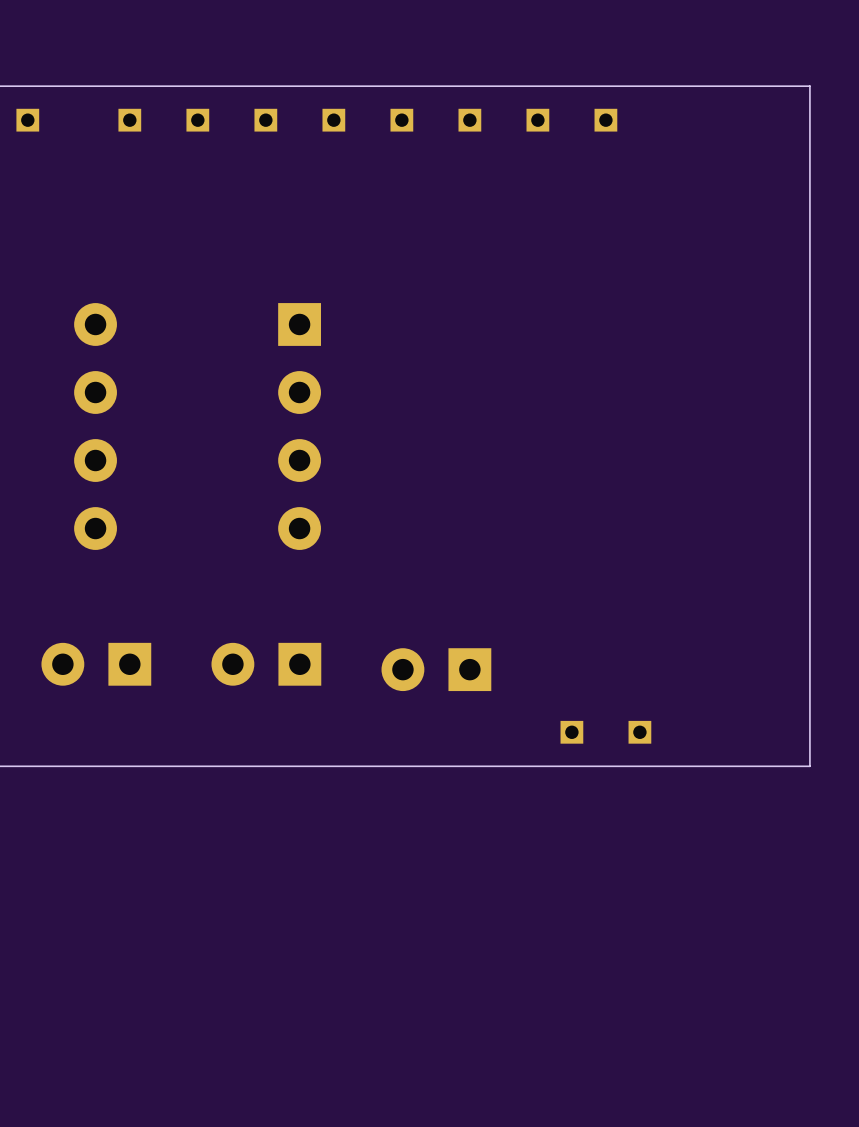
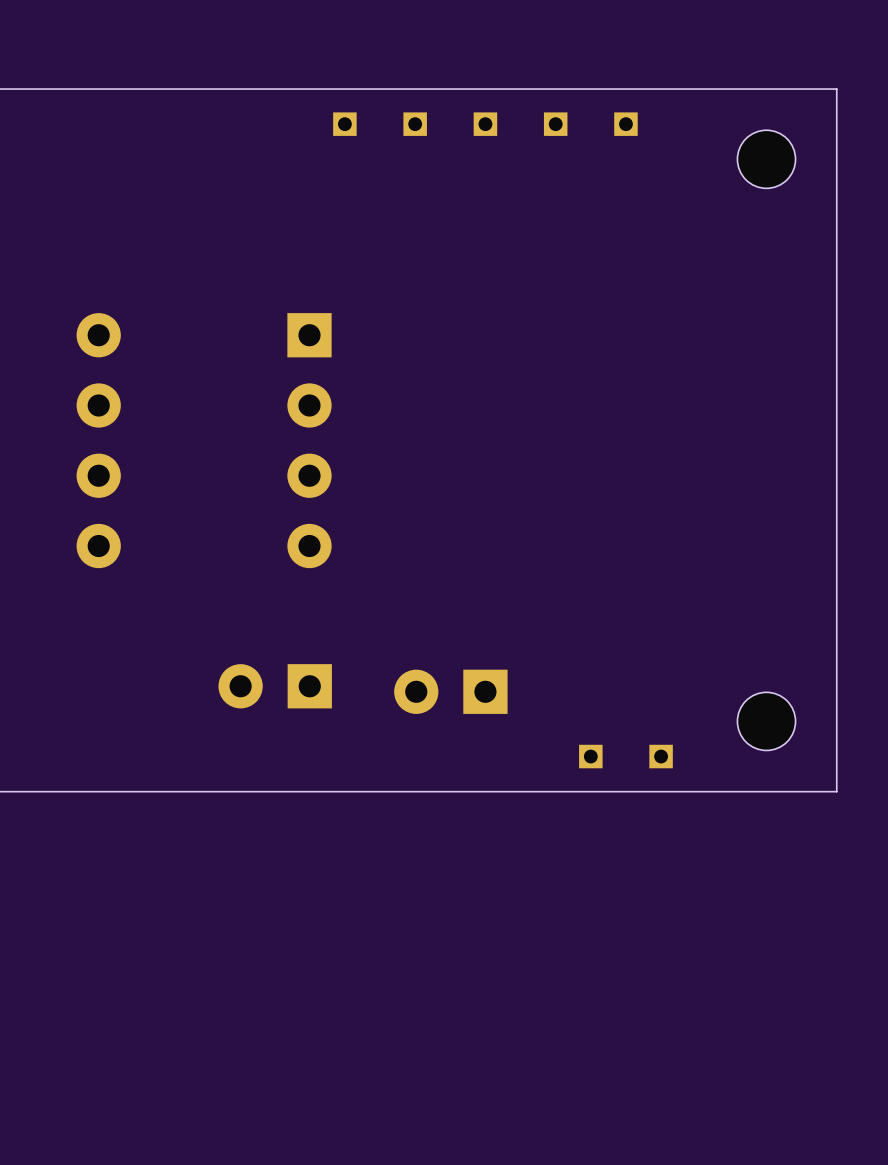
part: (27, 120) -> none
part: (129, 120) -> none
part: (197, 120) -> none
part: (265, 120) -> none
part: none -> (766, 159)
part: (96, 664) -> none
part: none -> (766, 721)

